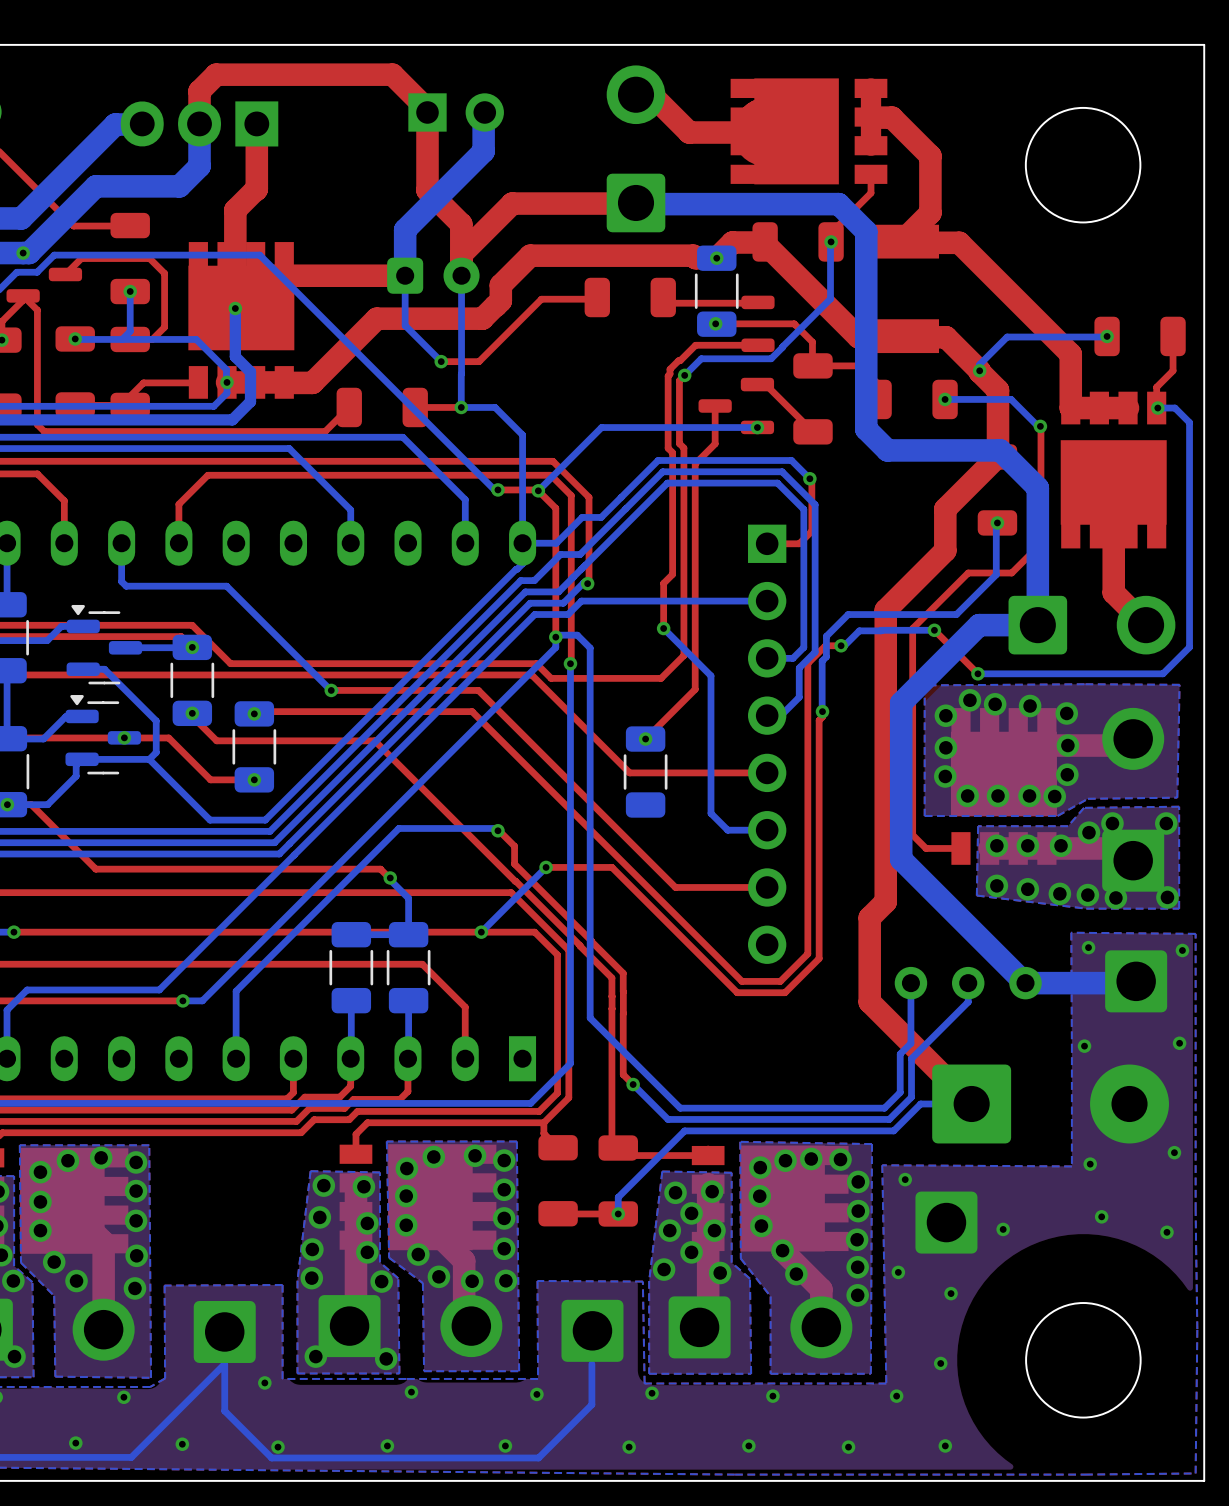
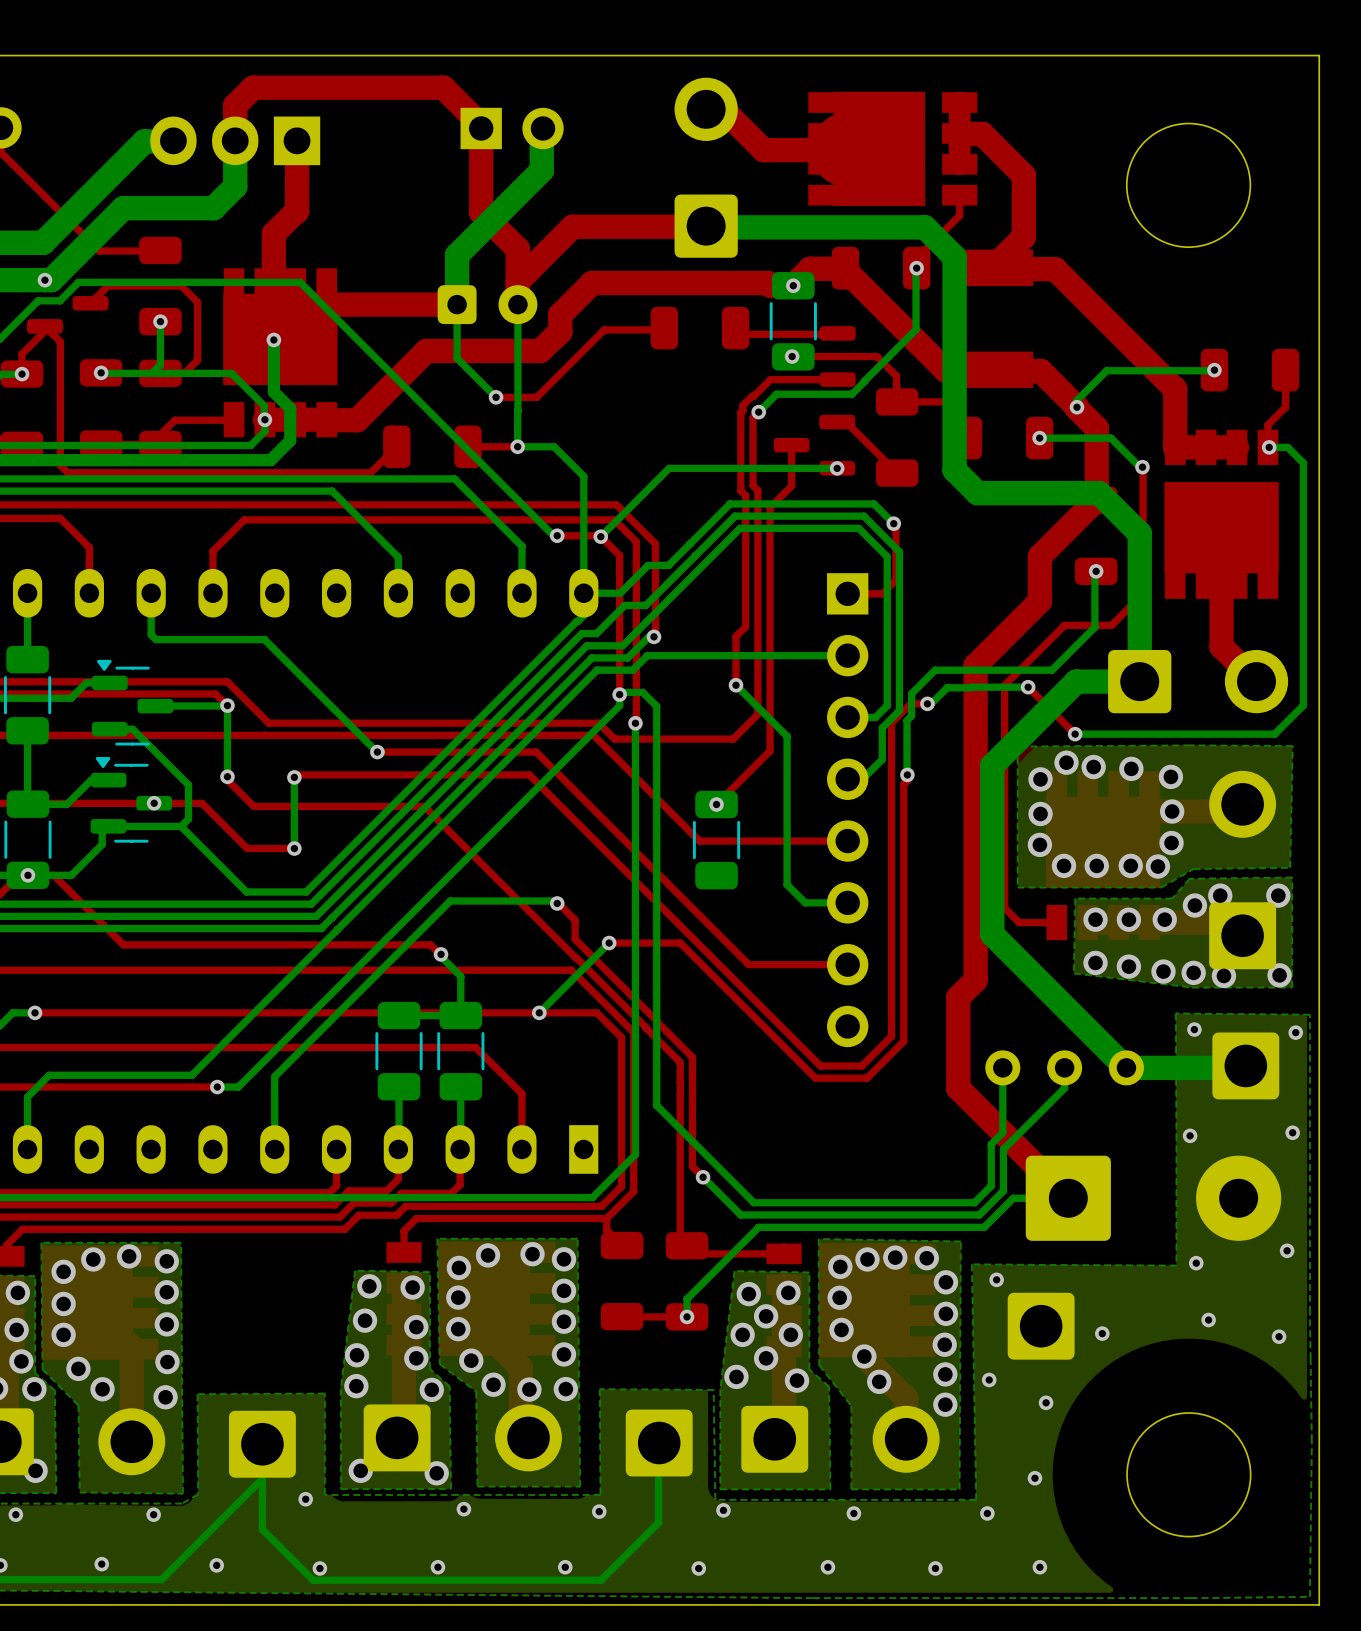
bottom track: none -> (227, 705) (227, 776)
part: (192, 680) -> none
bottom track: none -> (294, 777) (294, 848)
part: (254, 746) -> none

